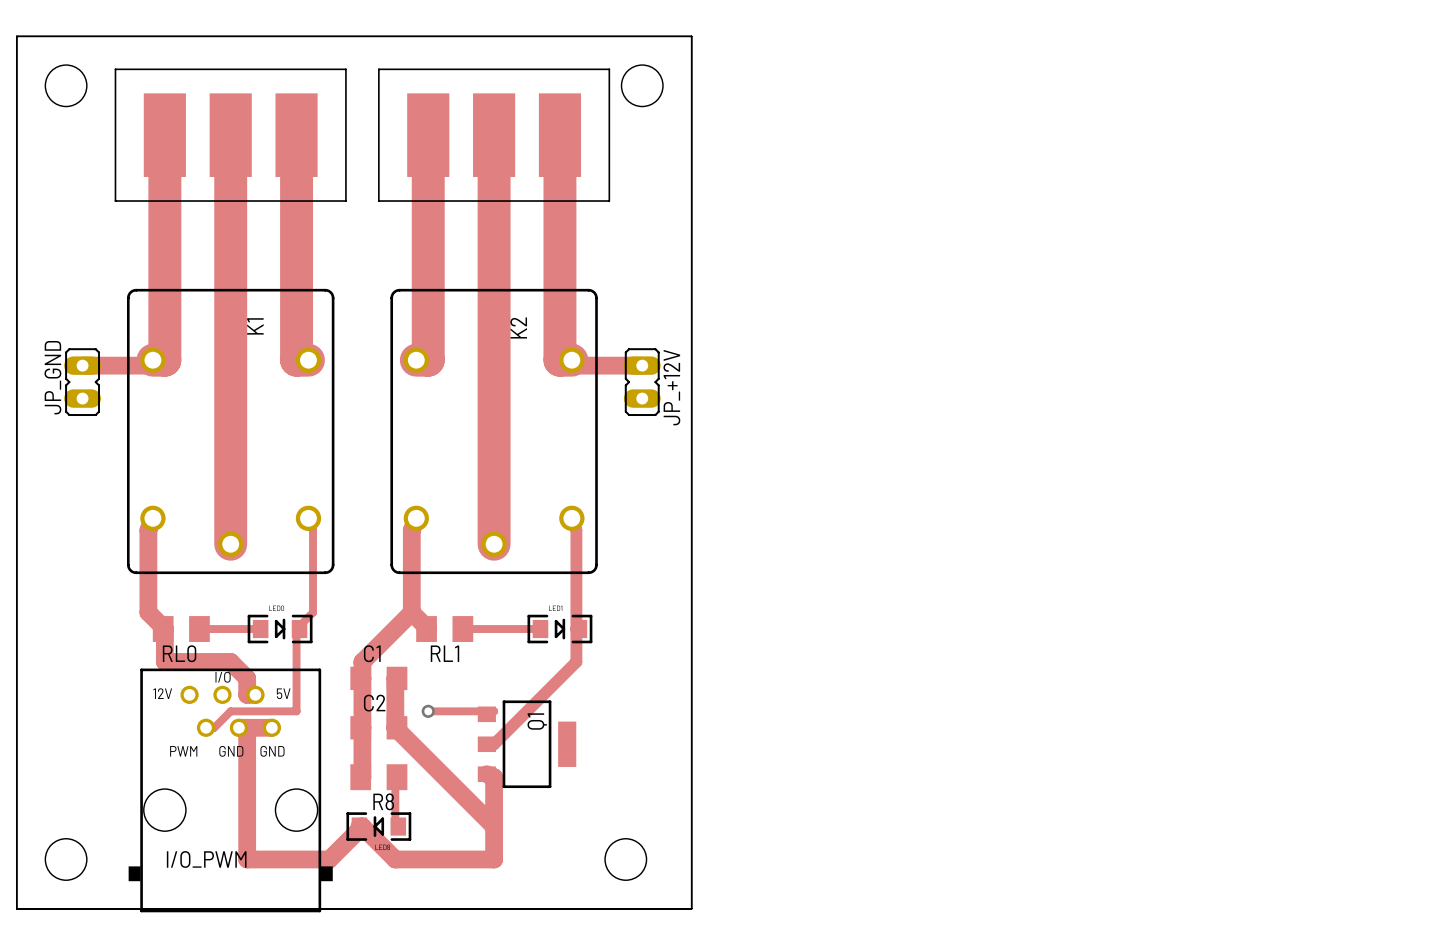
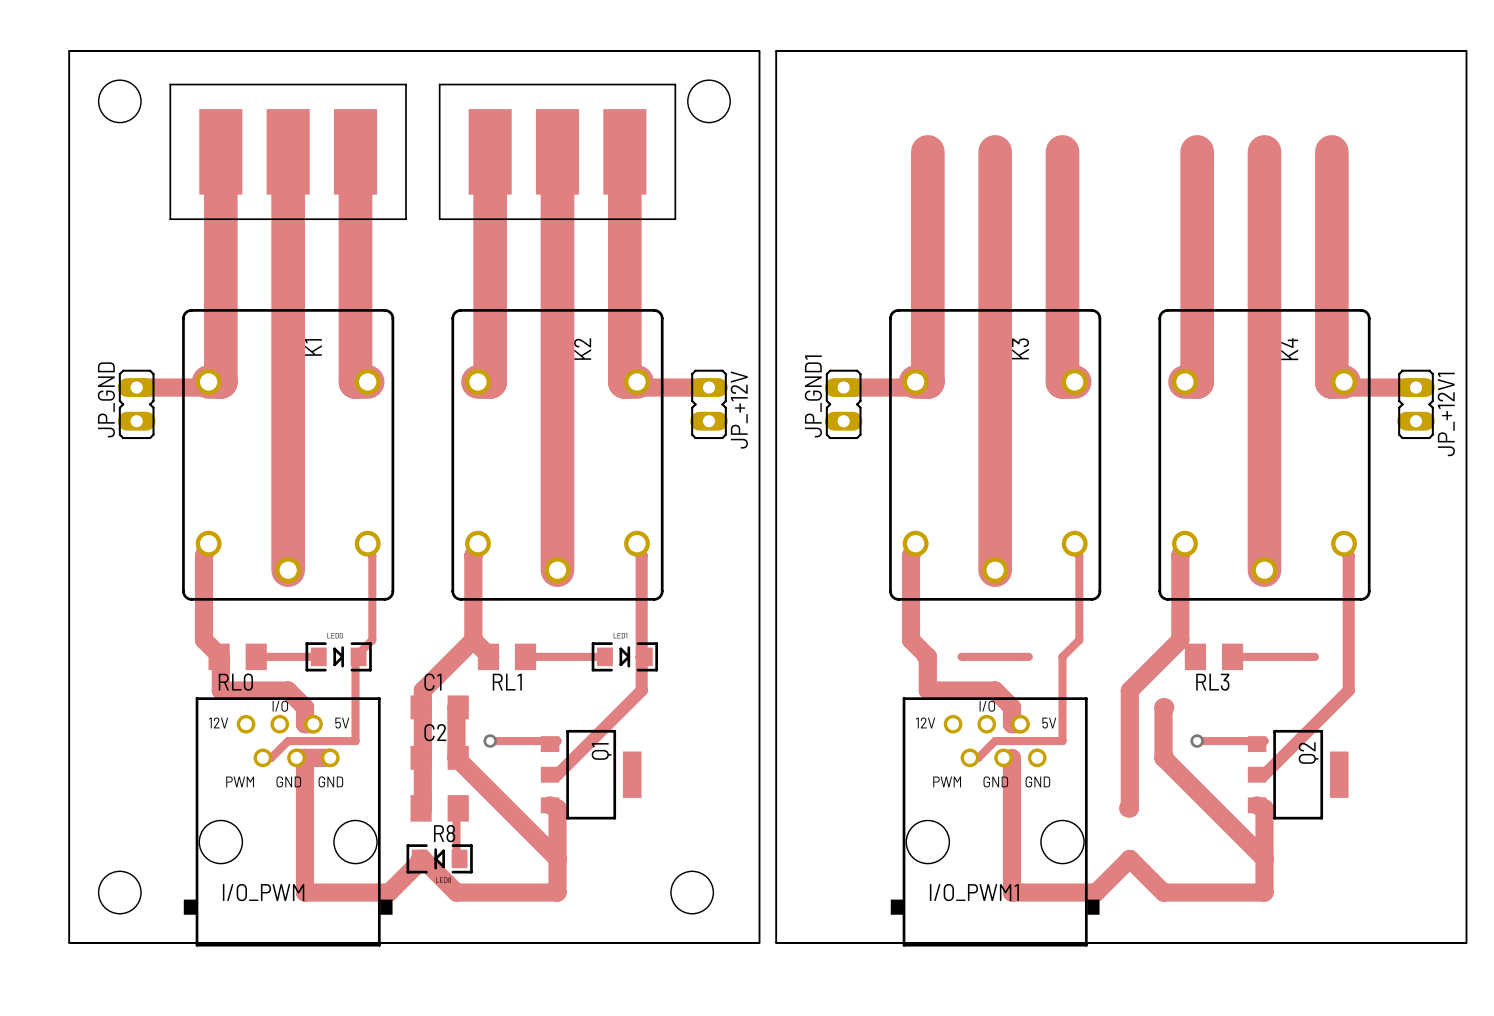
board edge: none -> (776, 50) (1466, 50) (1466, 943) (776, 943) (776, 50)
track: none -> (927, 151) (927, 381) (915, 381) (911, 387) (843, 387)
track: none -> (995, 151) (995, 570)
track: none -> (1062, 151) (1062, 381) (1074, 381)
track: none -> (1197, 151) (1197, 381) (1184, 381)
track: none -> (1264, 151) (1264, 570)
track: none -> (1331, 151) (1331, 381) (1344, 381) (1348, 387) (1416, 387)
JP_GND1: none -> (843, 404)
JP_+12V1: none -> (1416, 404)
K3: none -> (995, 454)
K4: none -> (1264, 454)
track: none -> (915, 543) (911, 555) (911, 640) (927, 656)
track: none -> (1074, 543) (1079, 555) (1079, 640) (1062, 656) (1062, 741) (995, 741) (978, 757) (969, 757)
track: none -> (1184, 543) (1180, 555) (1180, 640) (1129, 690) (1129, 808) (1128, 808)
track: none -> (1344, 543) (1348, 555) (1348, 690) (1264, 774) (1257, 774)
track: none -> (927, 656) (927, 690) (995, 690) (1012, 707) (1012, 724) (1020, 724)
track: none -> (961, 656) (1028, 656)
RL3: none -> (1214, 656)
track: none -> (1230, 656) (1315, 656)
track: none -> (1165, 707) (1163, 707) (1163, 757)
track: none -> (1197, 741) (1264, 741) (1257, 744)
via: none -> (1197, 741)
track: none -> (1012, 757) (1012, 892) (1096, 892) (1129, 858) (1163, 892) (1264, 892) (1264, 808) (1257, 805)
track: none -> (1163, 757) (1264, 858)
Q2: none -> (1298, 774)
I/O_PWM1: none -> (995, 821)

